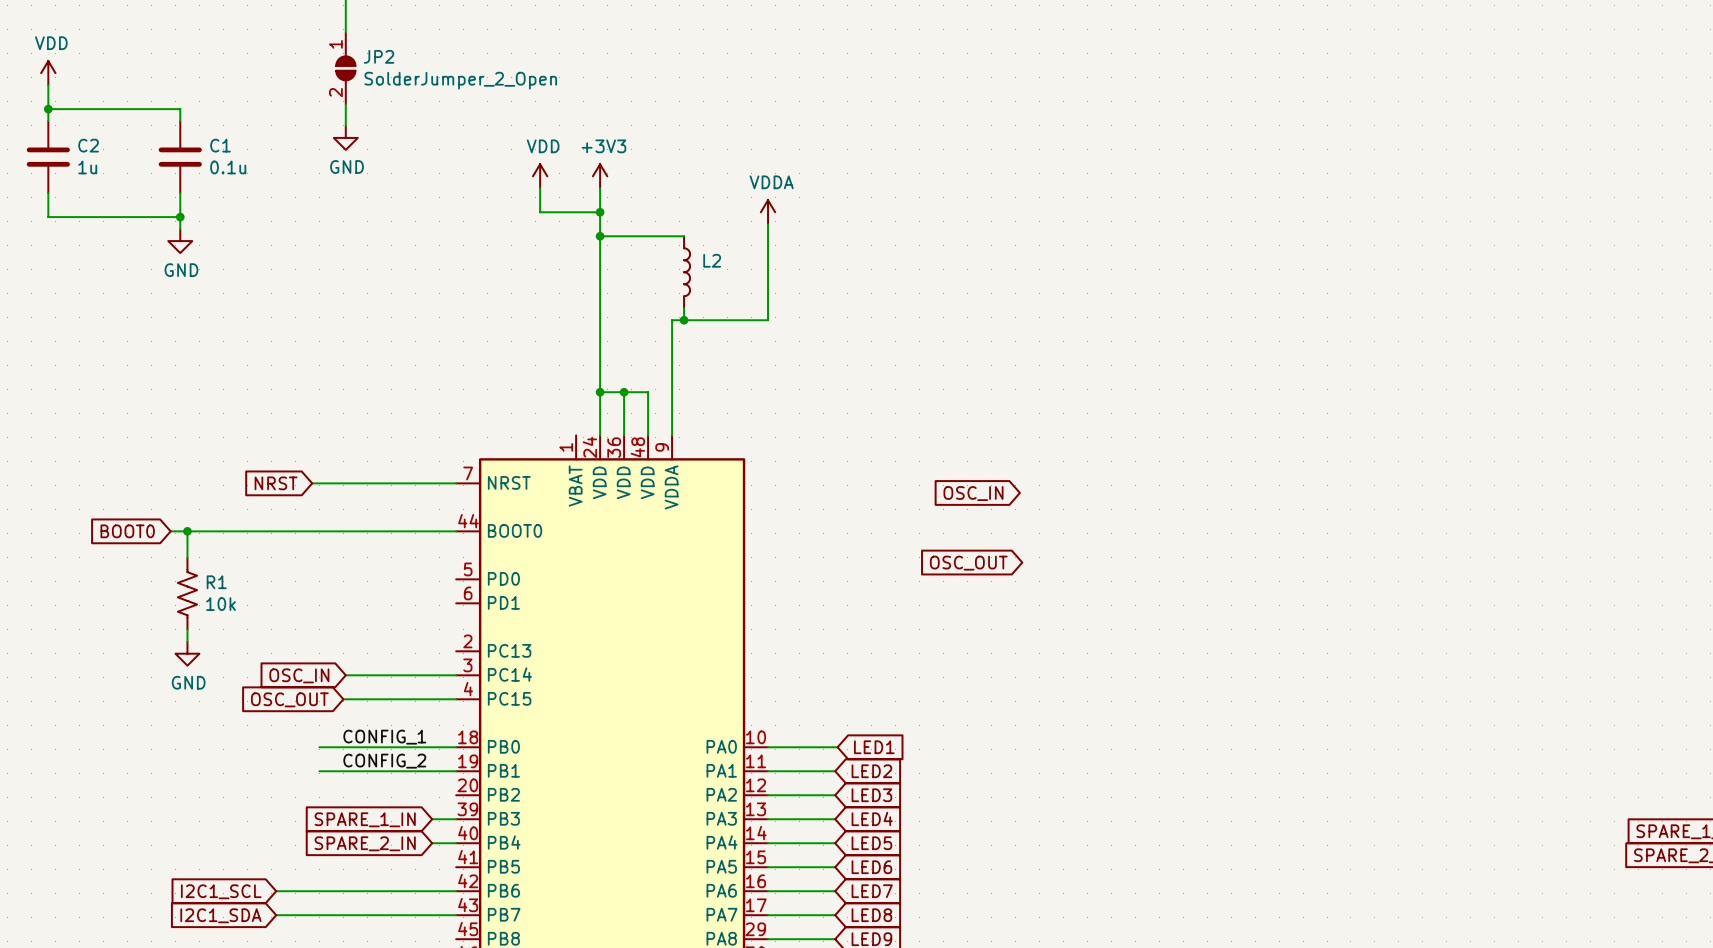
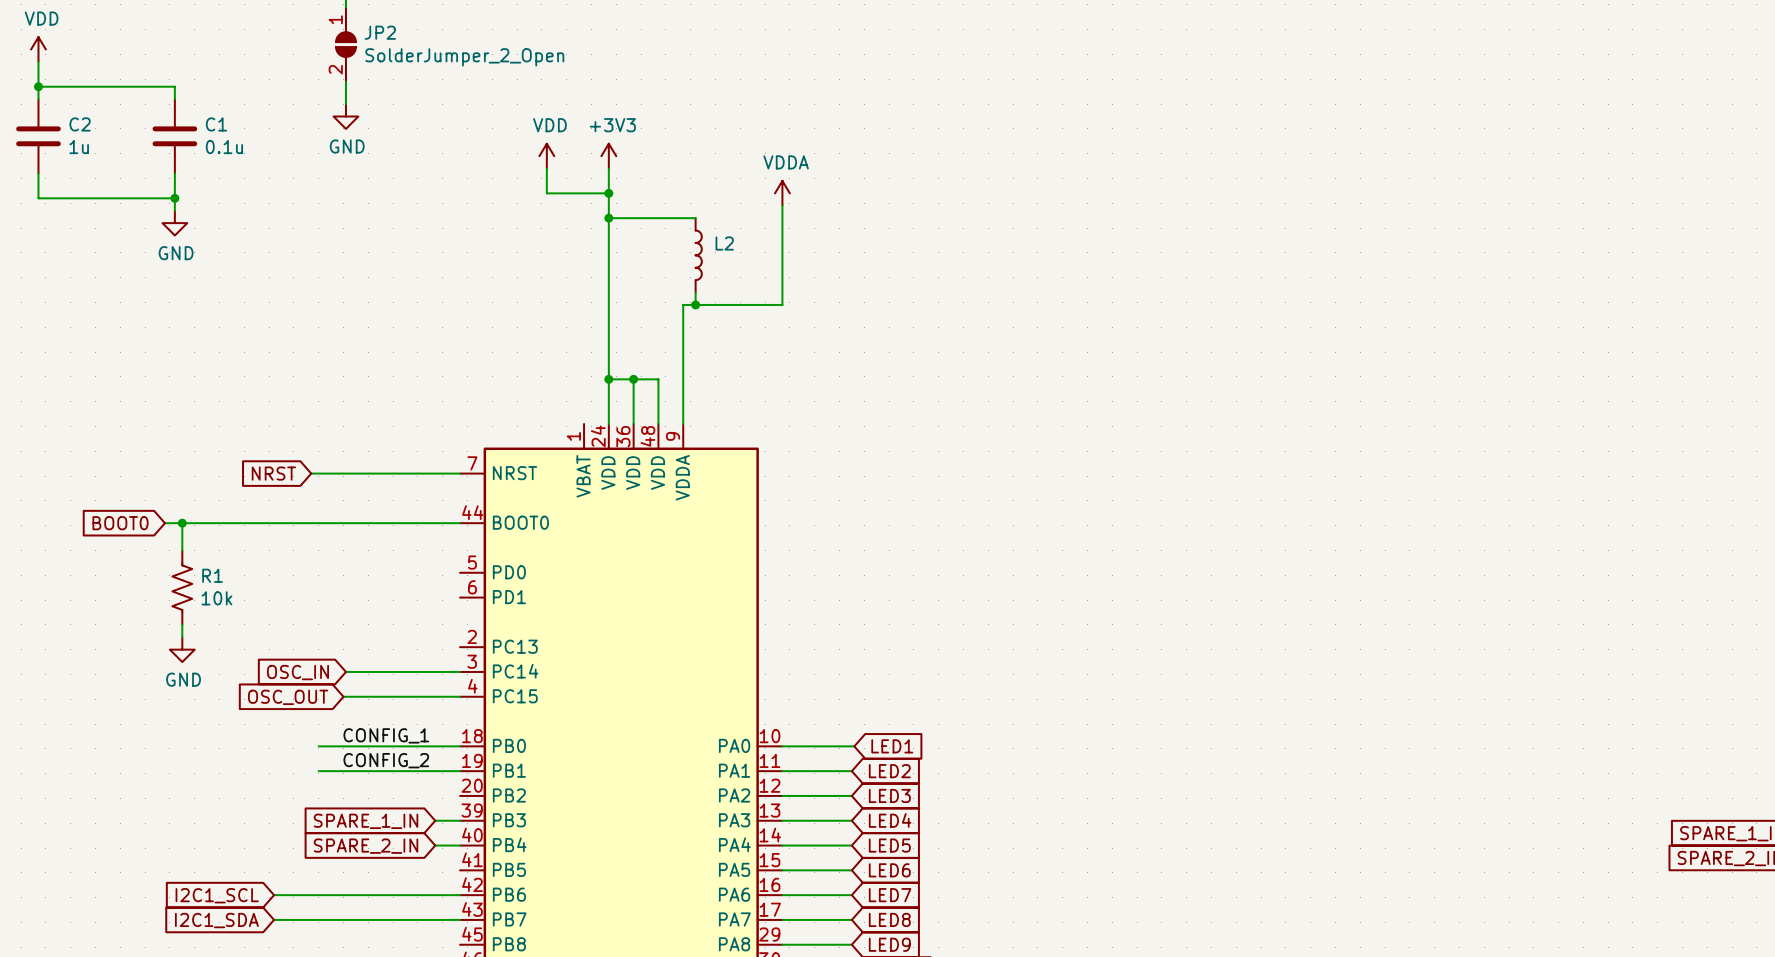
global label: OSC_IN (973, 493) -> none
global label: OSC_OUT (968, 563) -> none

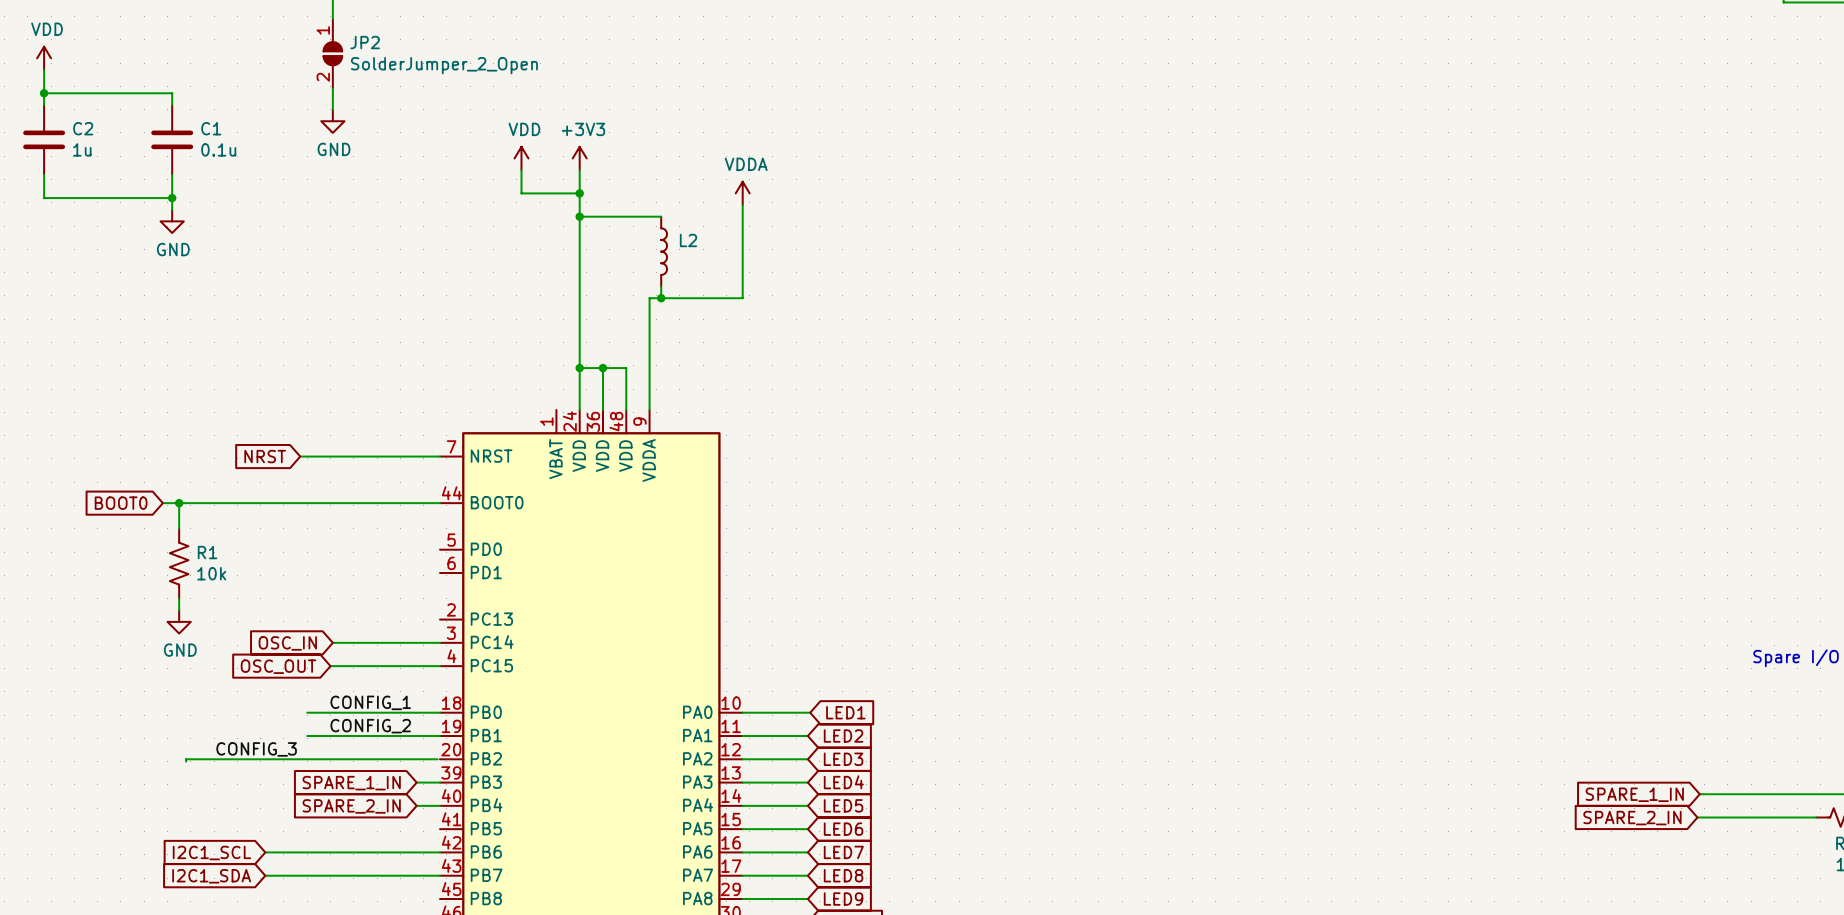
label: none -> CONFIG_3 (256, 749)
wire: none -> (437, 759) (186, 759) (186, 761)

